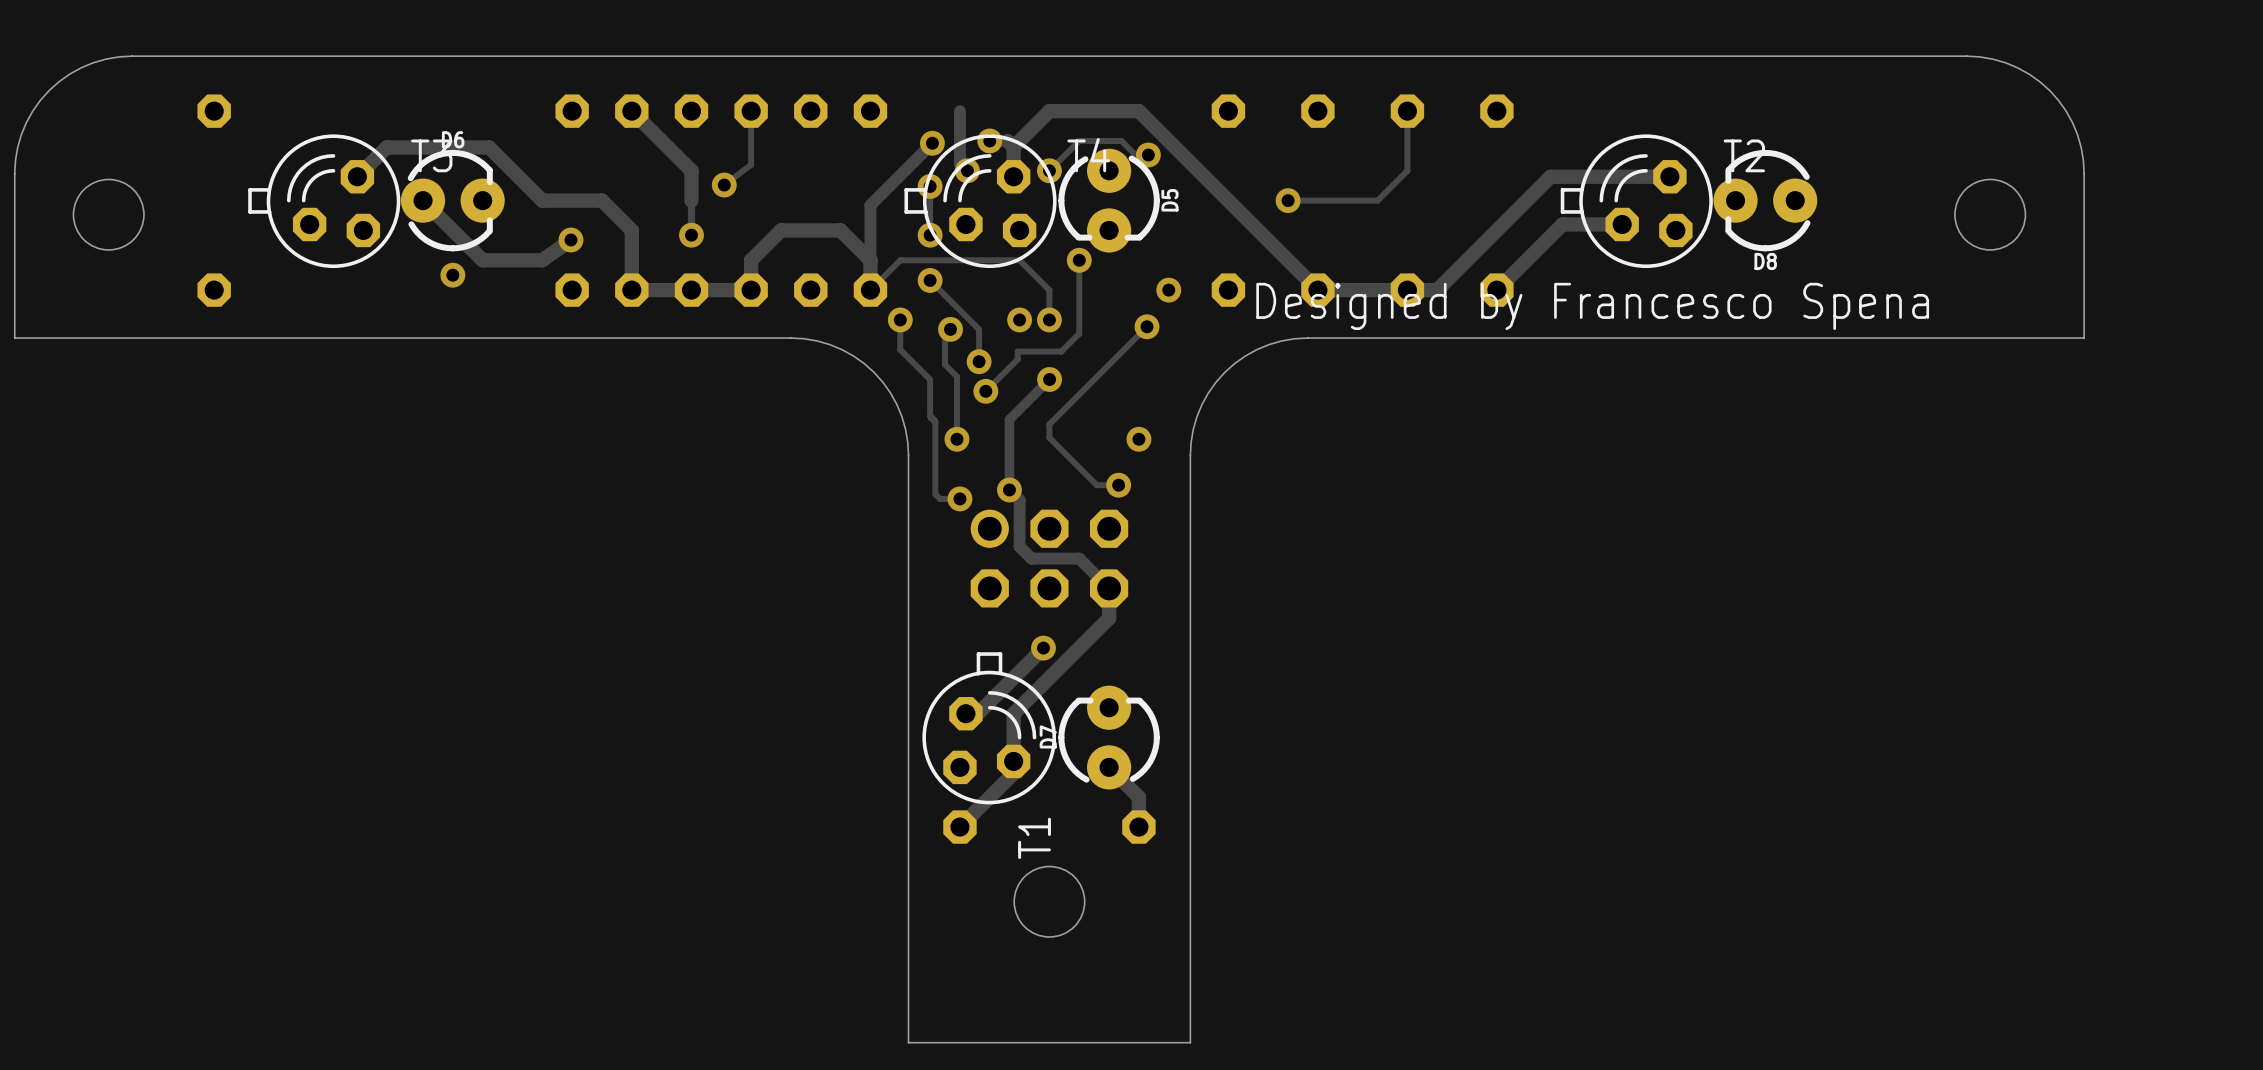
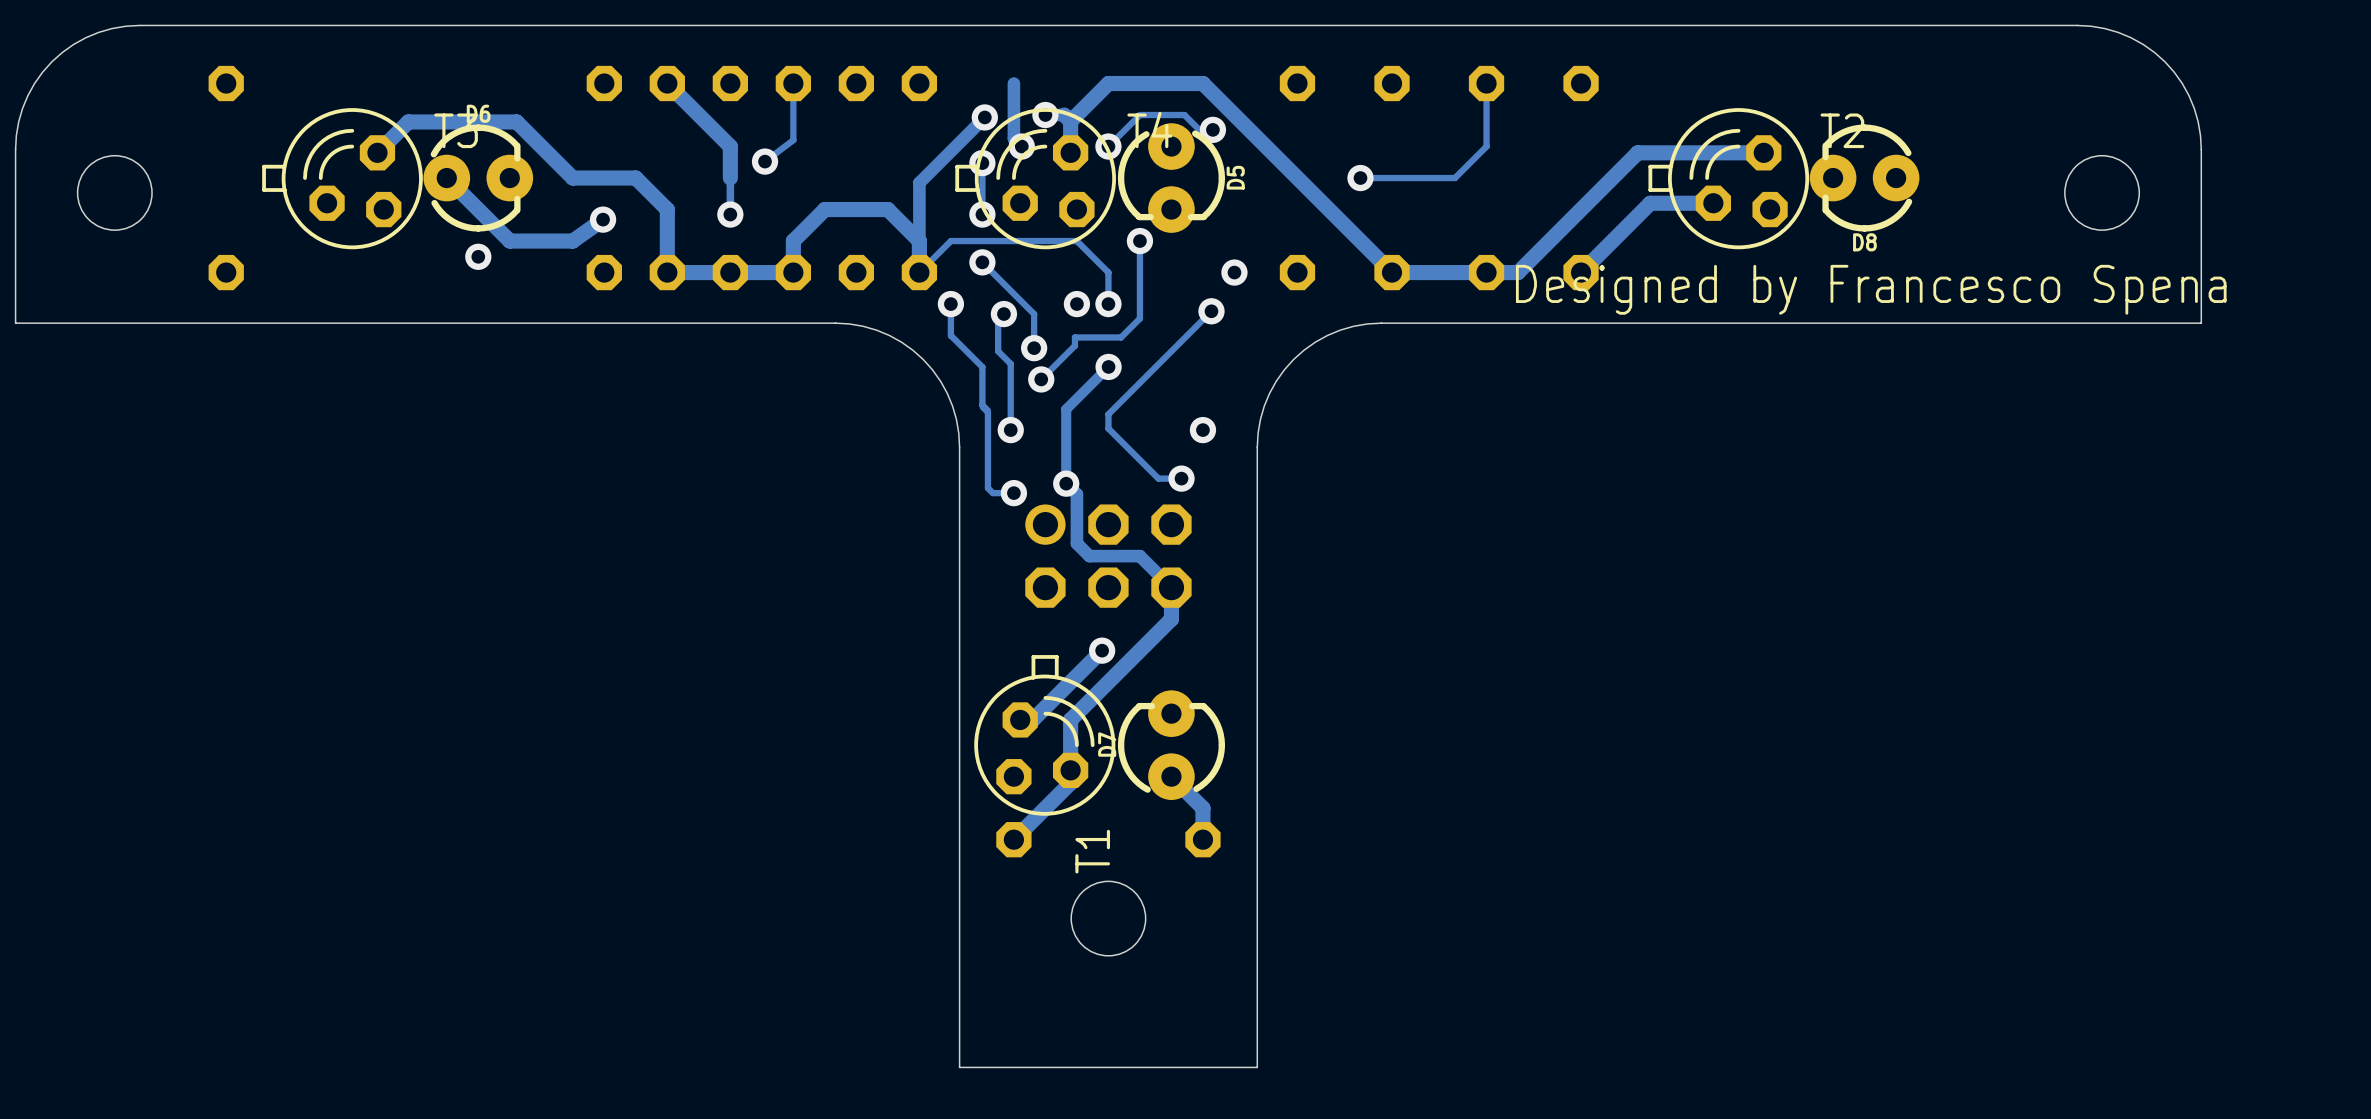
text position: Designed by Francesco Spena (1592, 306) -> Designed by Francesco Spena (1871, 289)

